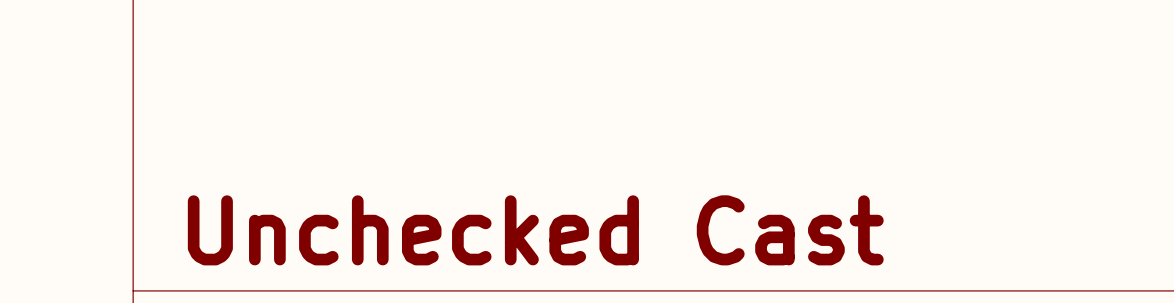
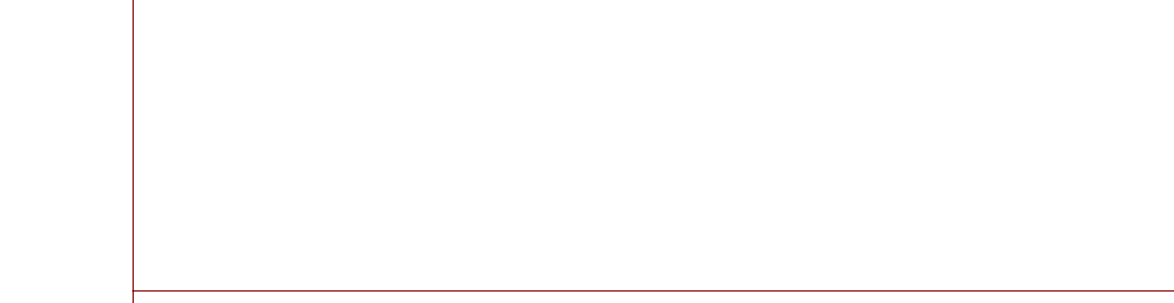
title block: Unchecked Cast (535, 230) -> none

